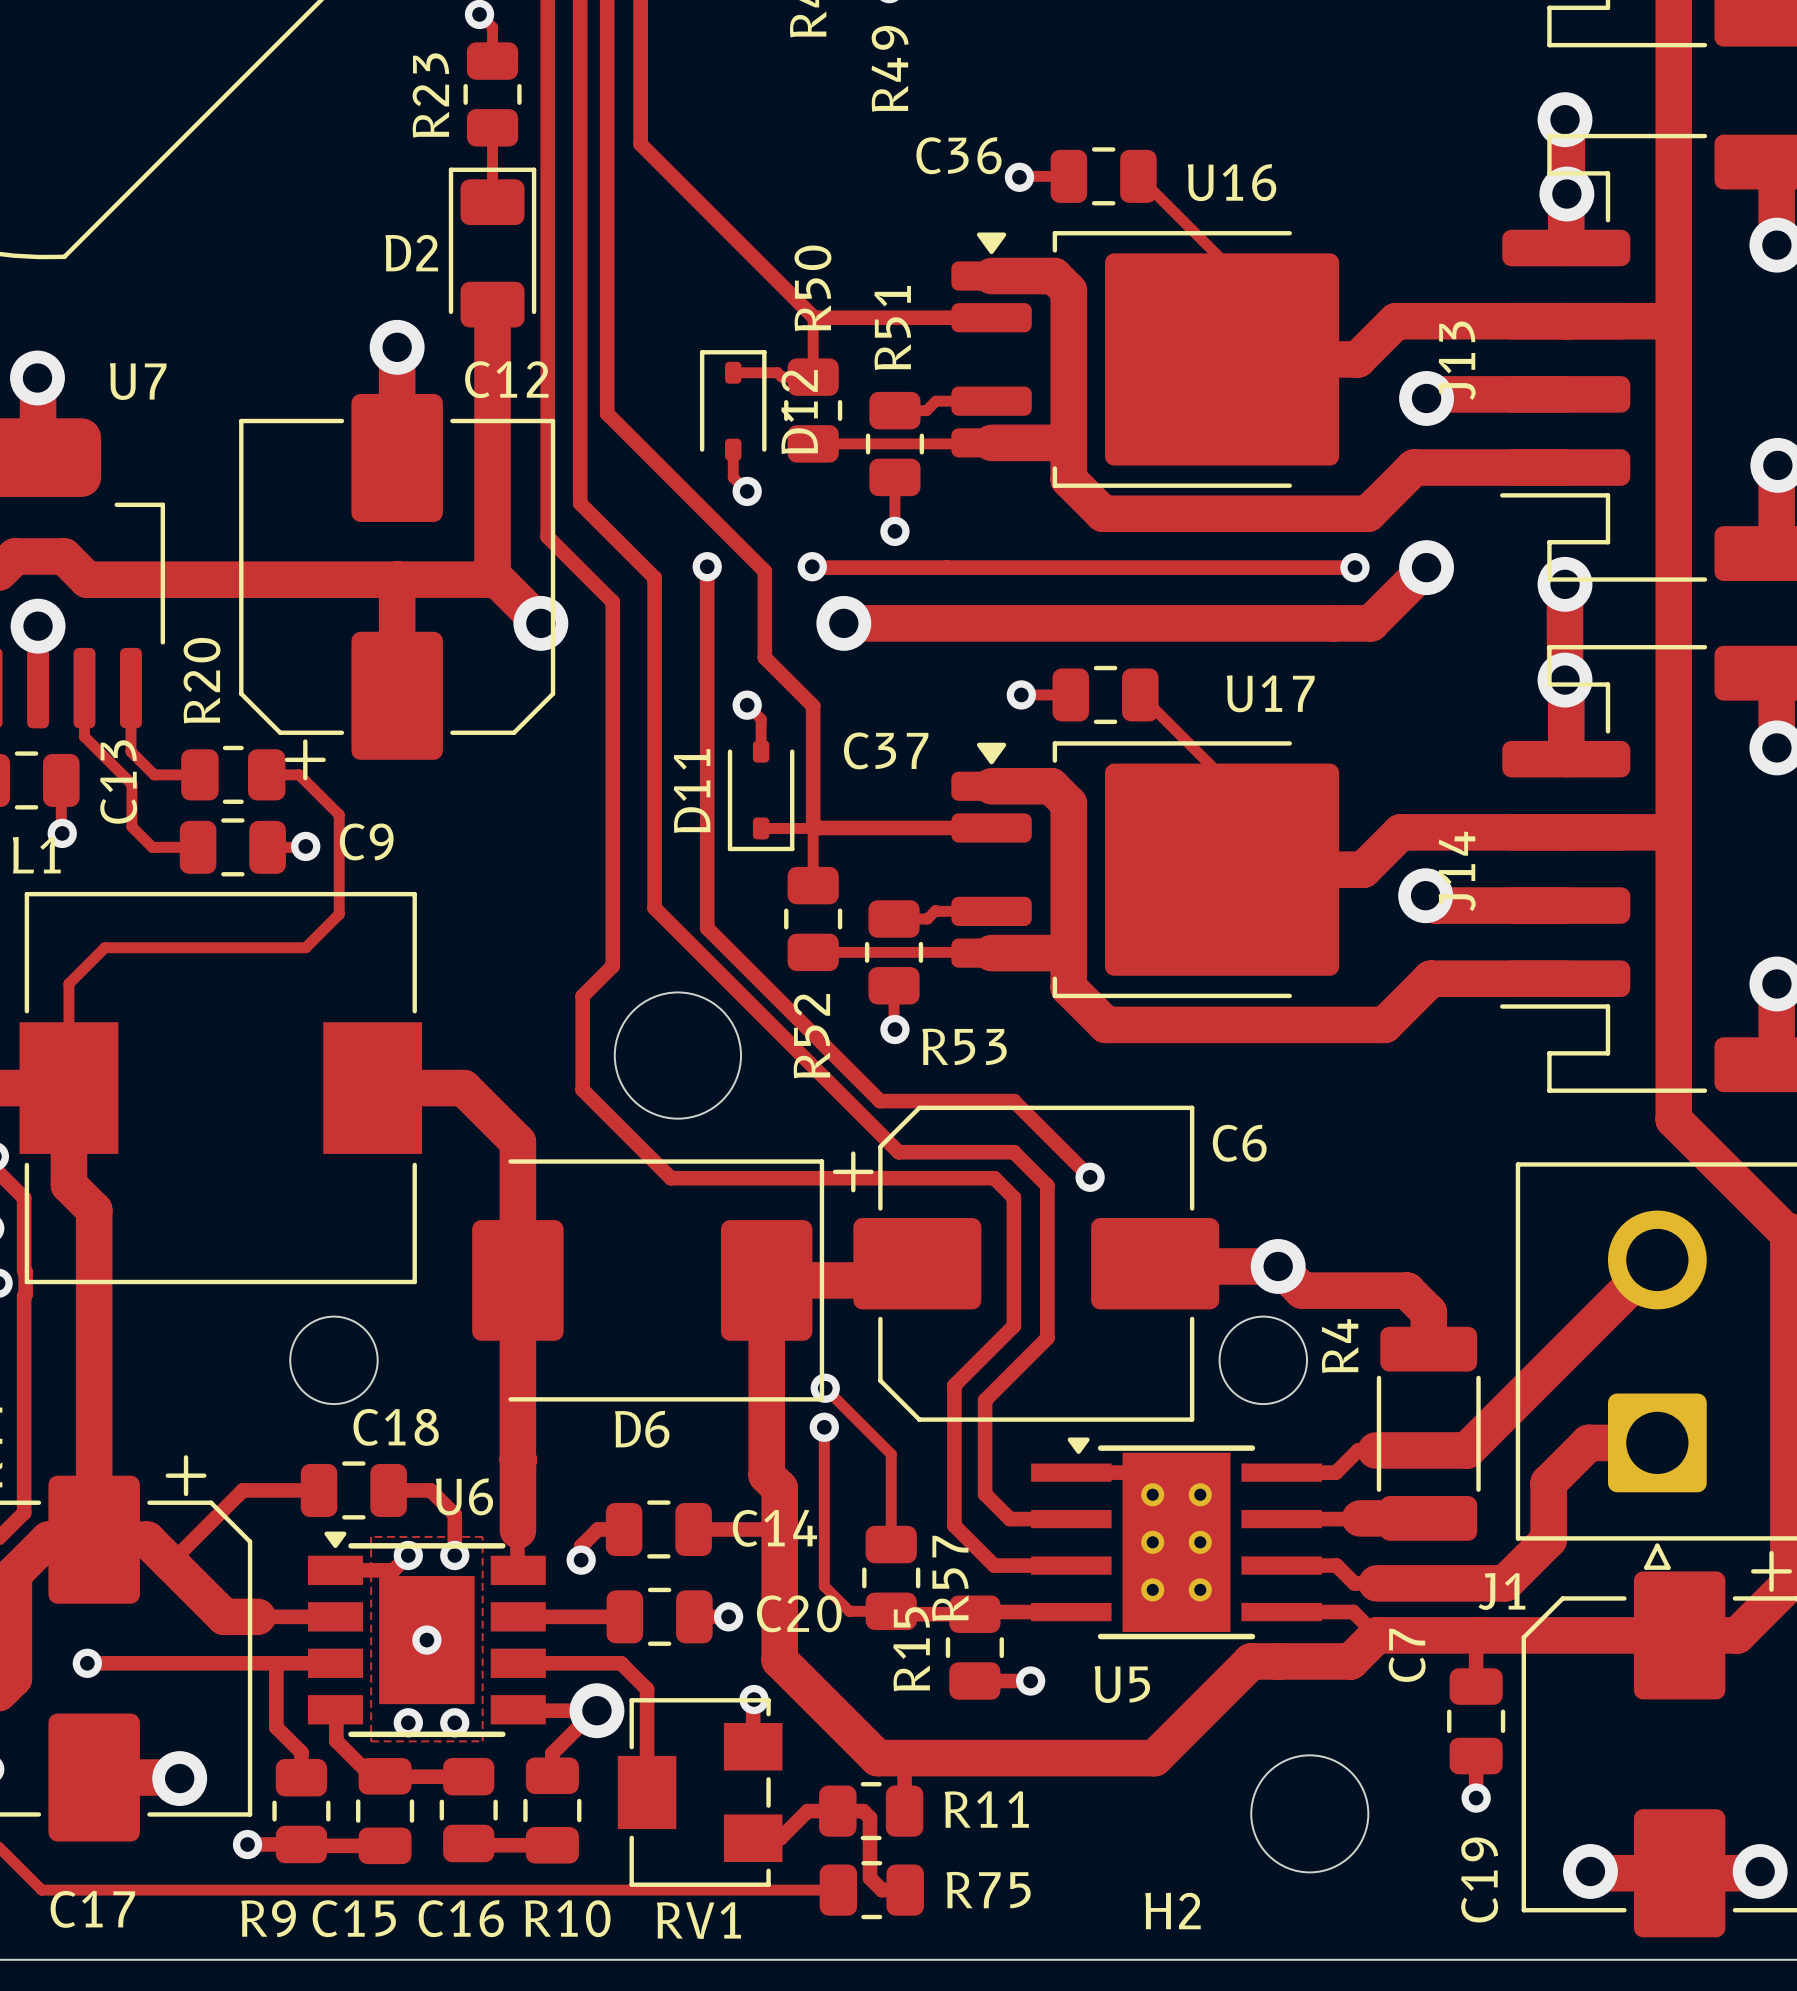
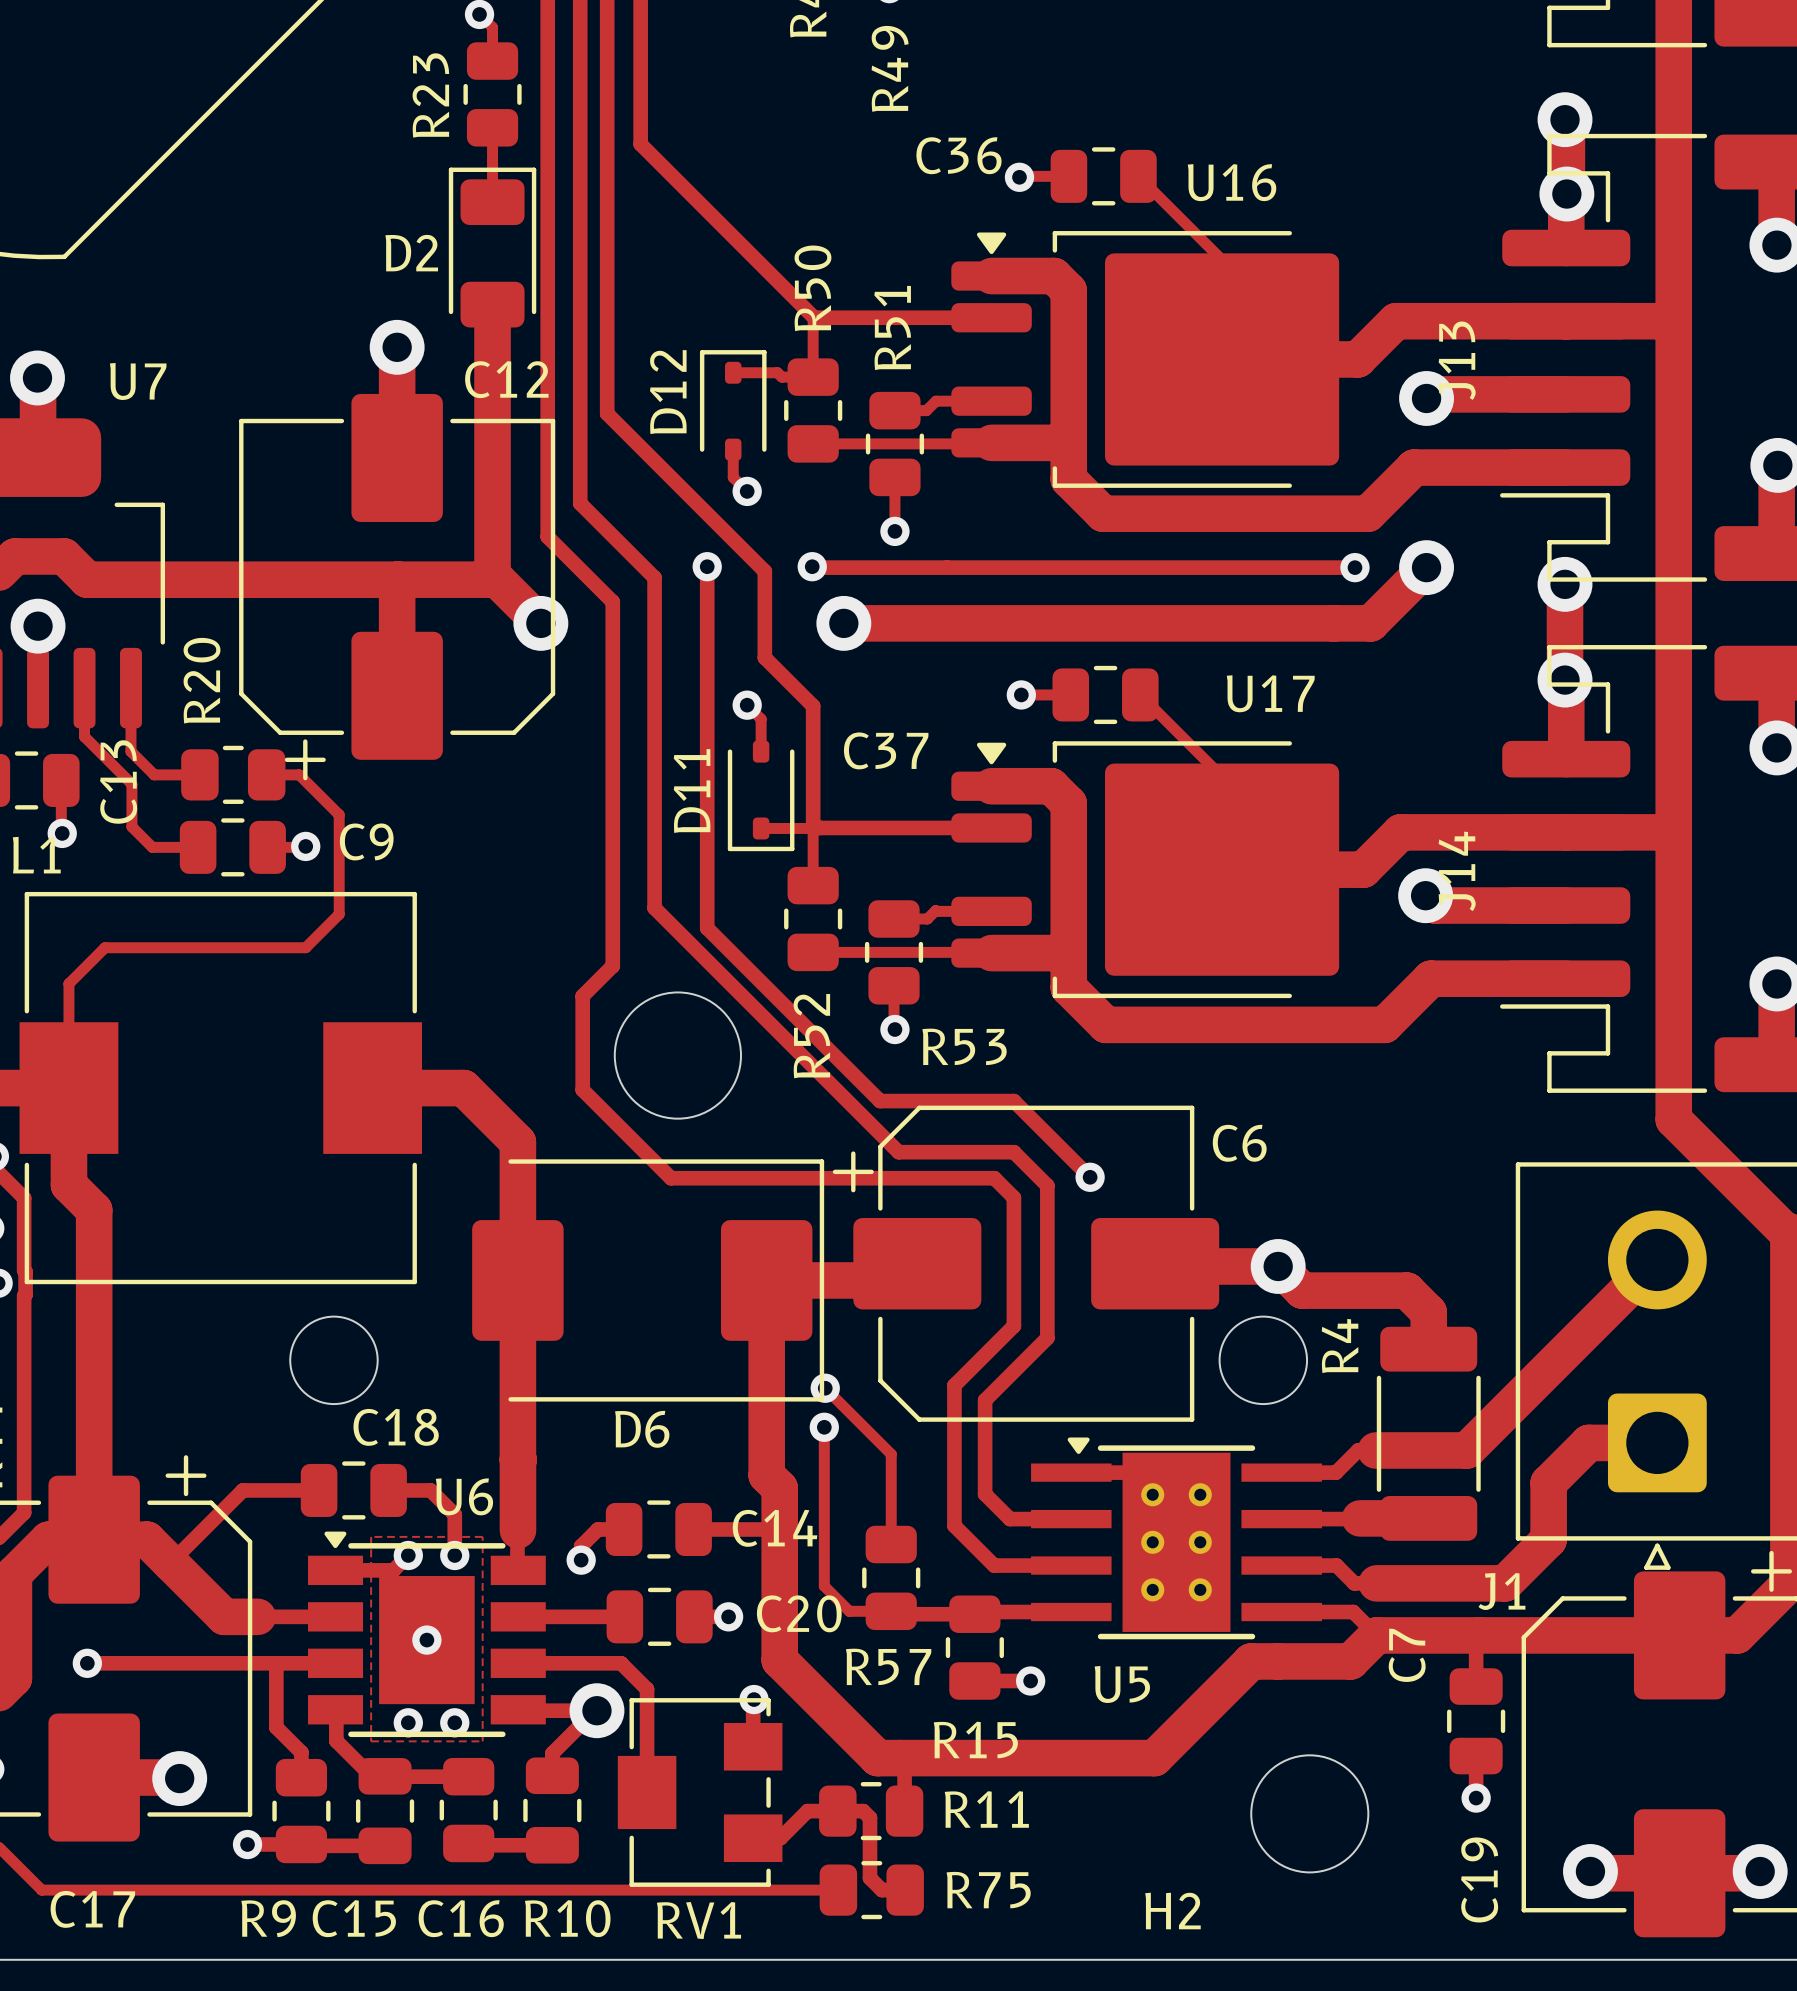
D12 name position: D12 (799, 412) -> D12 (668, 392)
R57 name rotation: 0° (950, 1578) -> 90° clockwise (888, 1666)
R15 name rotation: 0° (911, 1649) -> 90° clockwise (975, 1739)

